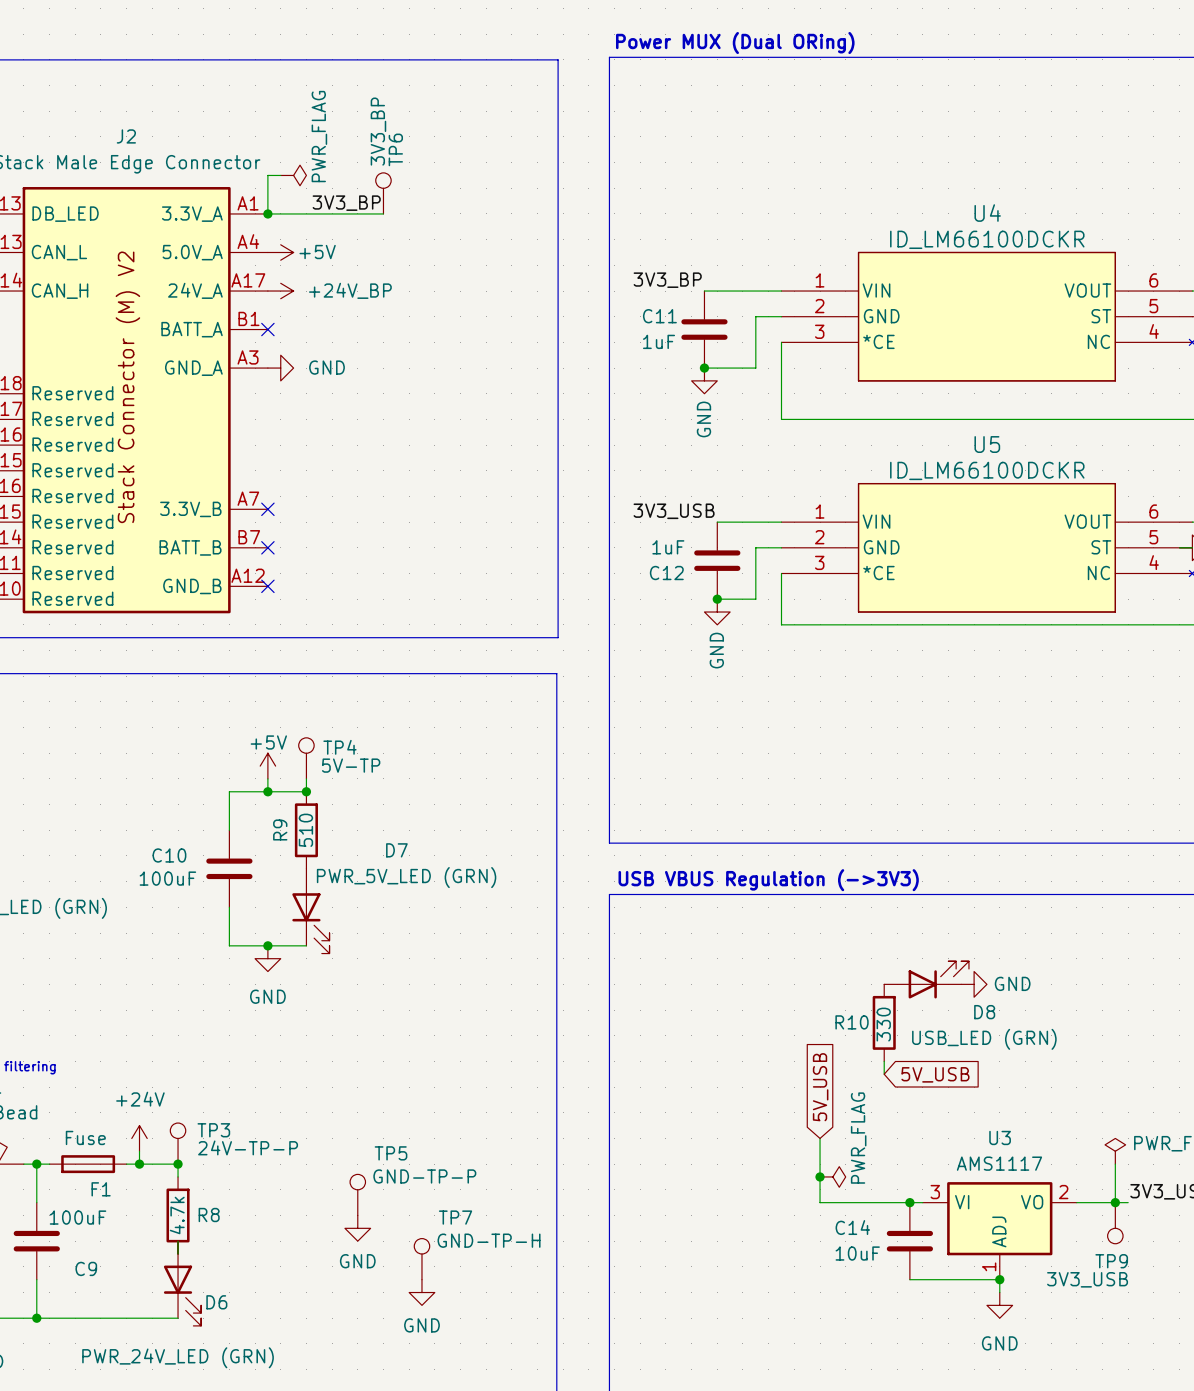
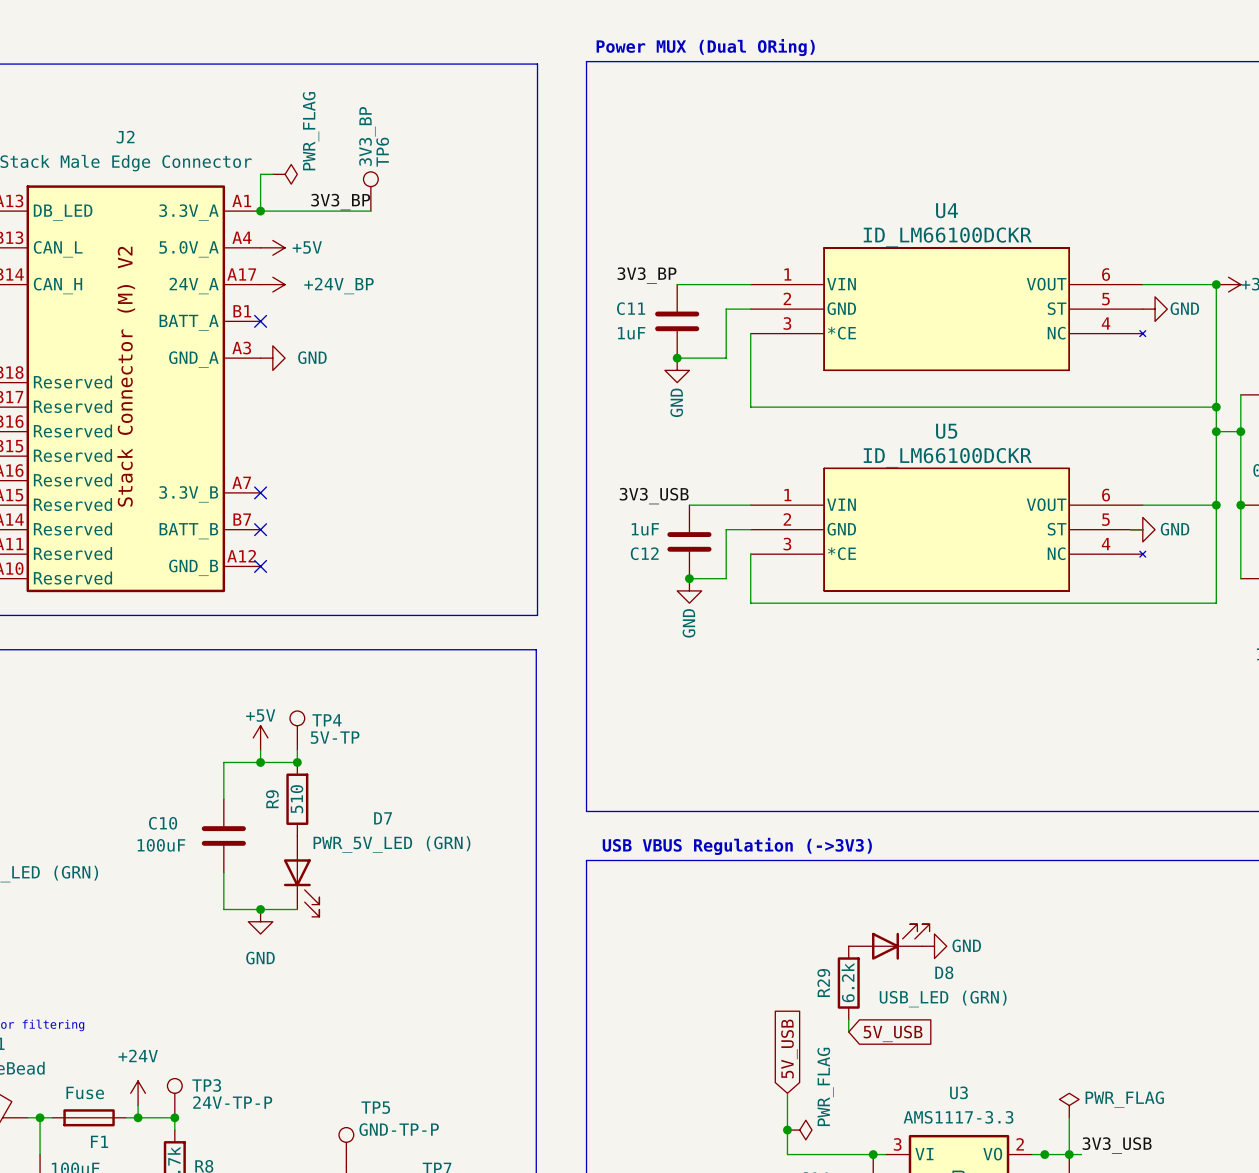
R10 name: R10 (852, 1022) -> R29 (823, 983)
R10 value: 330 (883, 1024) -> 6.2k (848, 982)
U3 value: AMS1117 (999, 1163) -> AMS1117-3.3 (958, 1117)
junction: none -> (1044, 1154)

